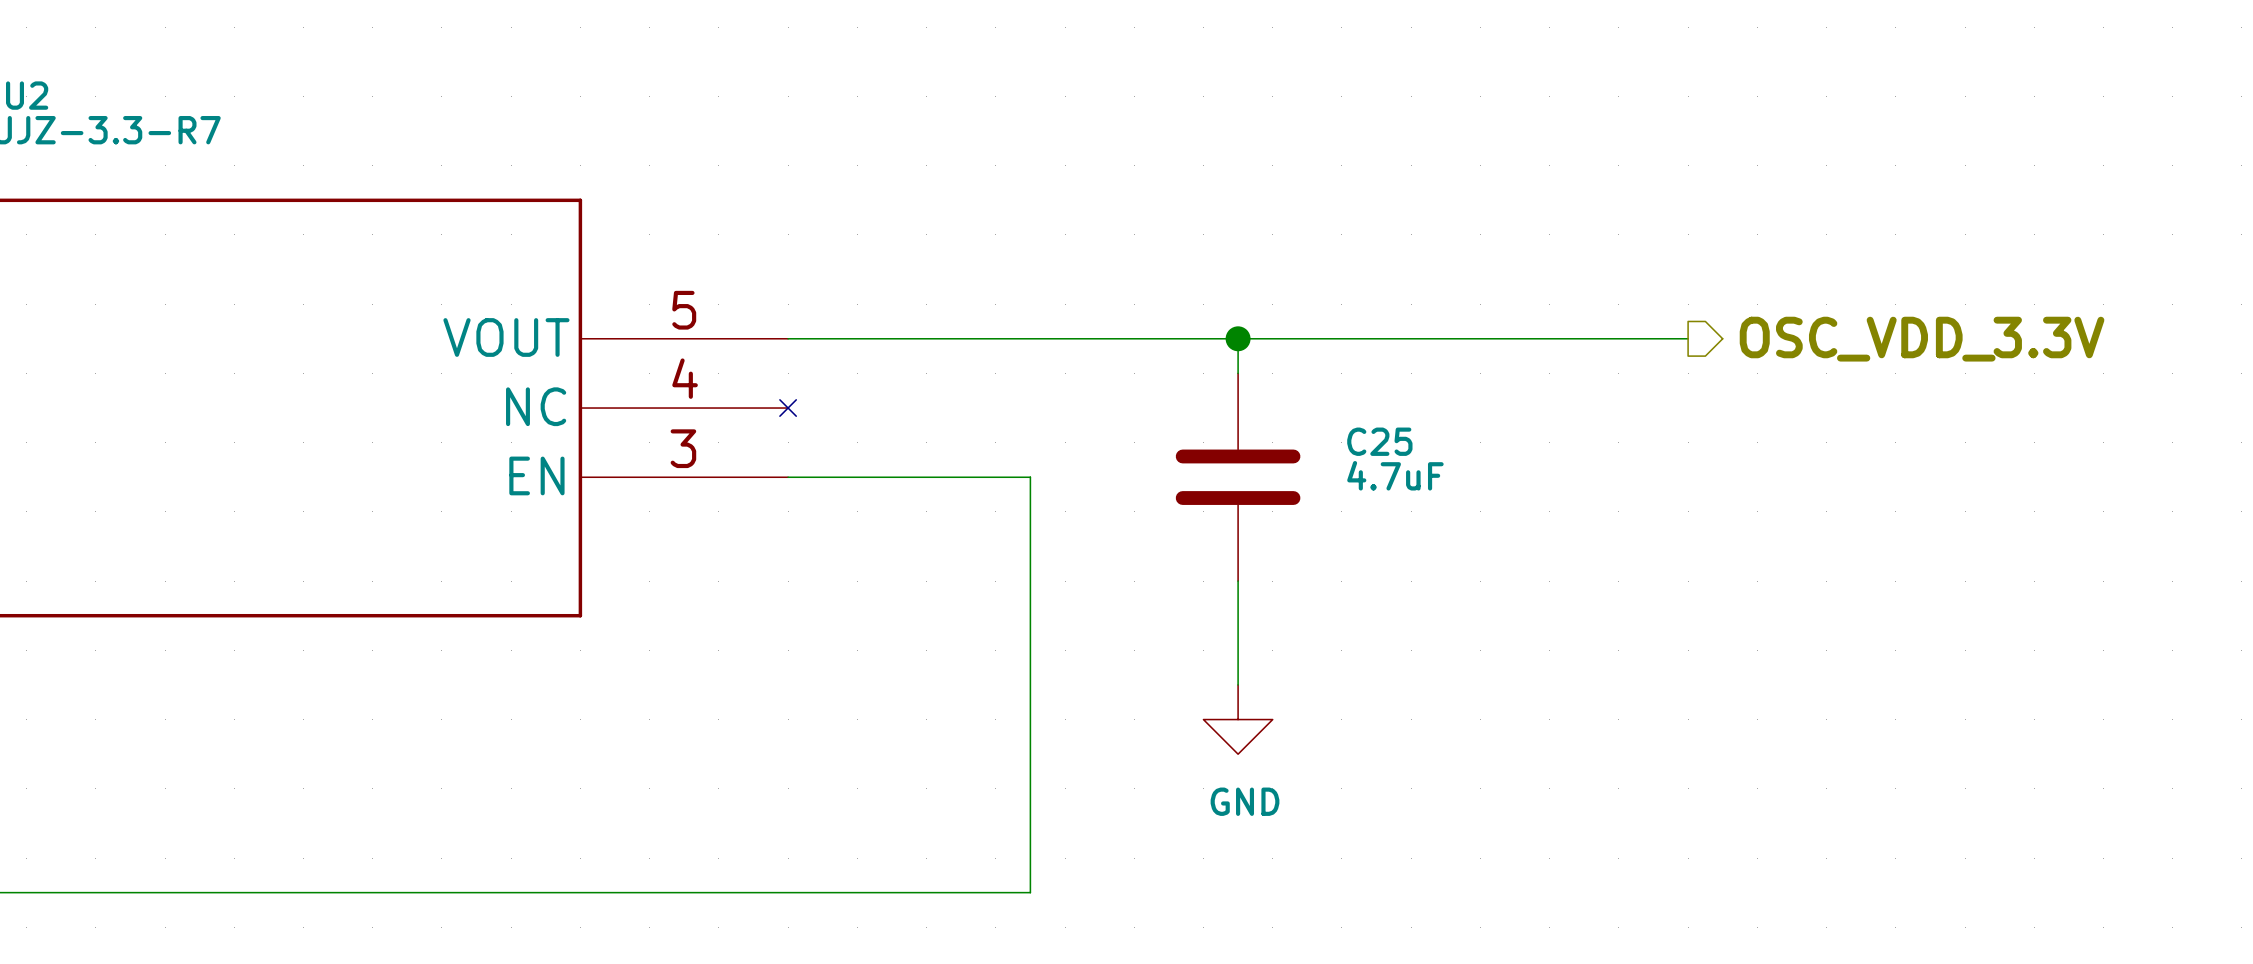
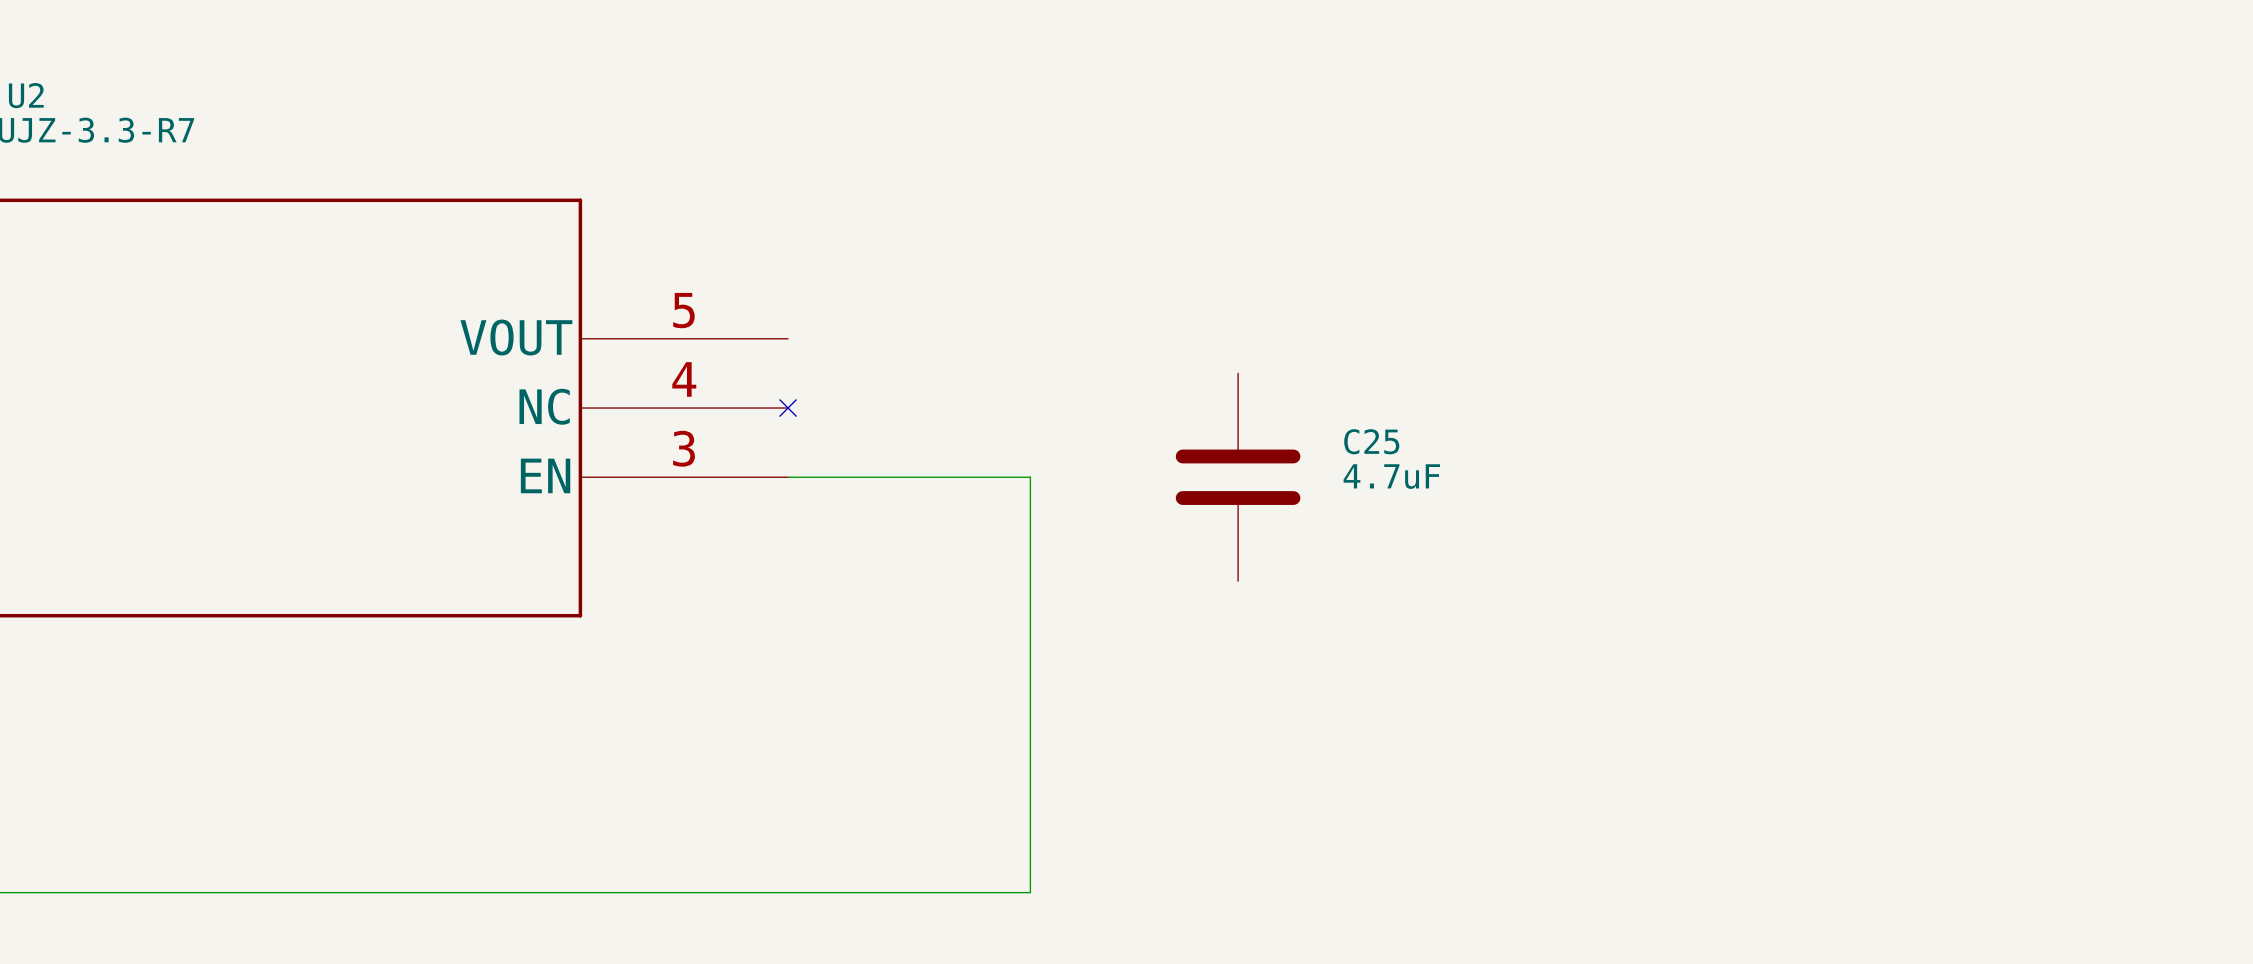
wire: (788, 338) (1688, 338) -> none
wire: (1238, 338) (1238, 373) -> none
junction: (1238, 338) -> none
hierarchical label: OSC_VDD_3.3V (1922, 339) -> none
wire: (1238, 581) (1238, 684) -> none
power symbol: GND (1238, 719) -> none

